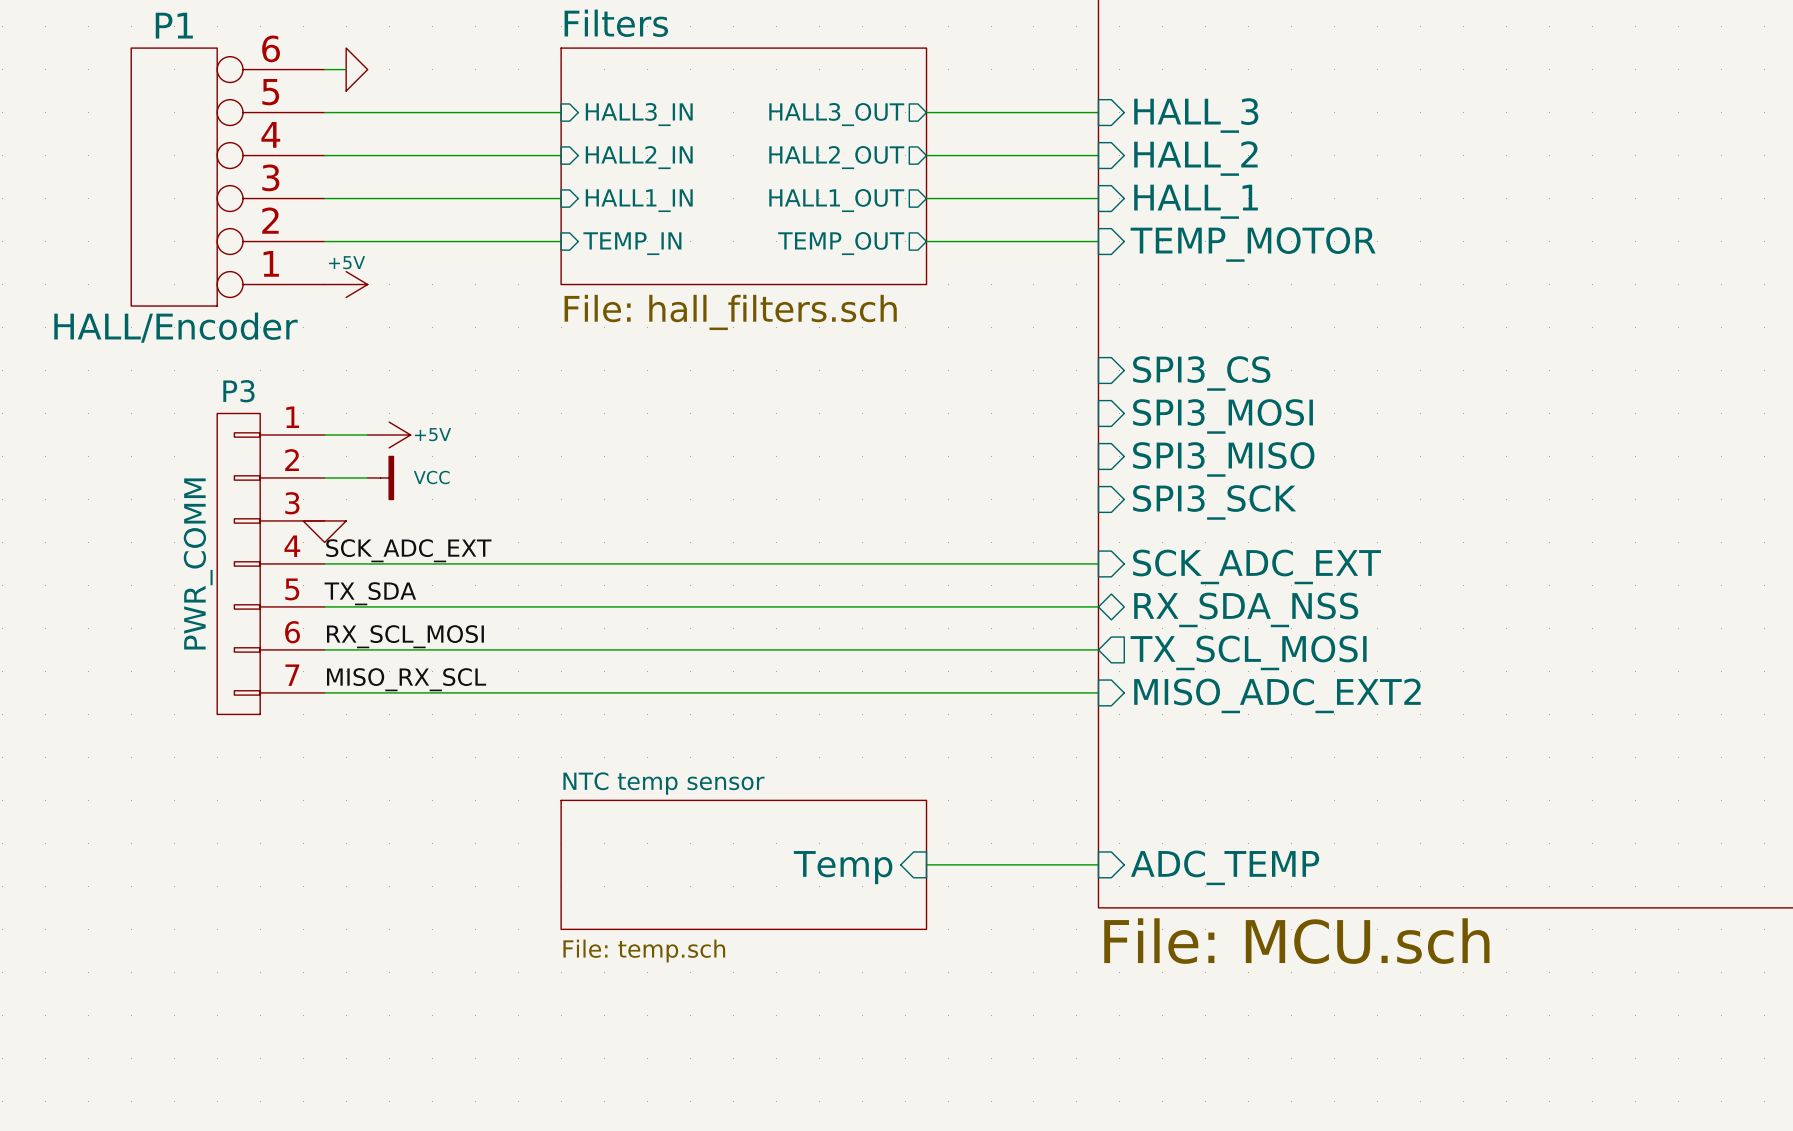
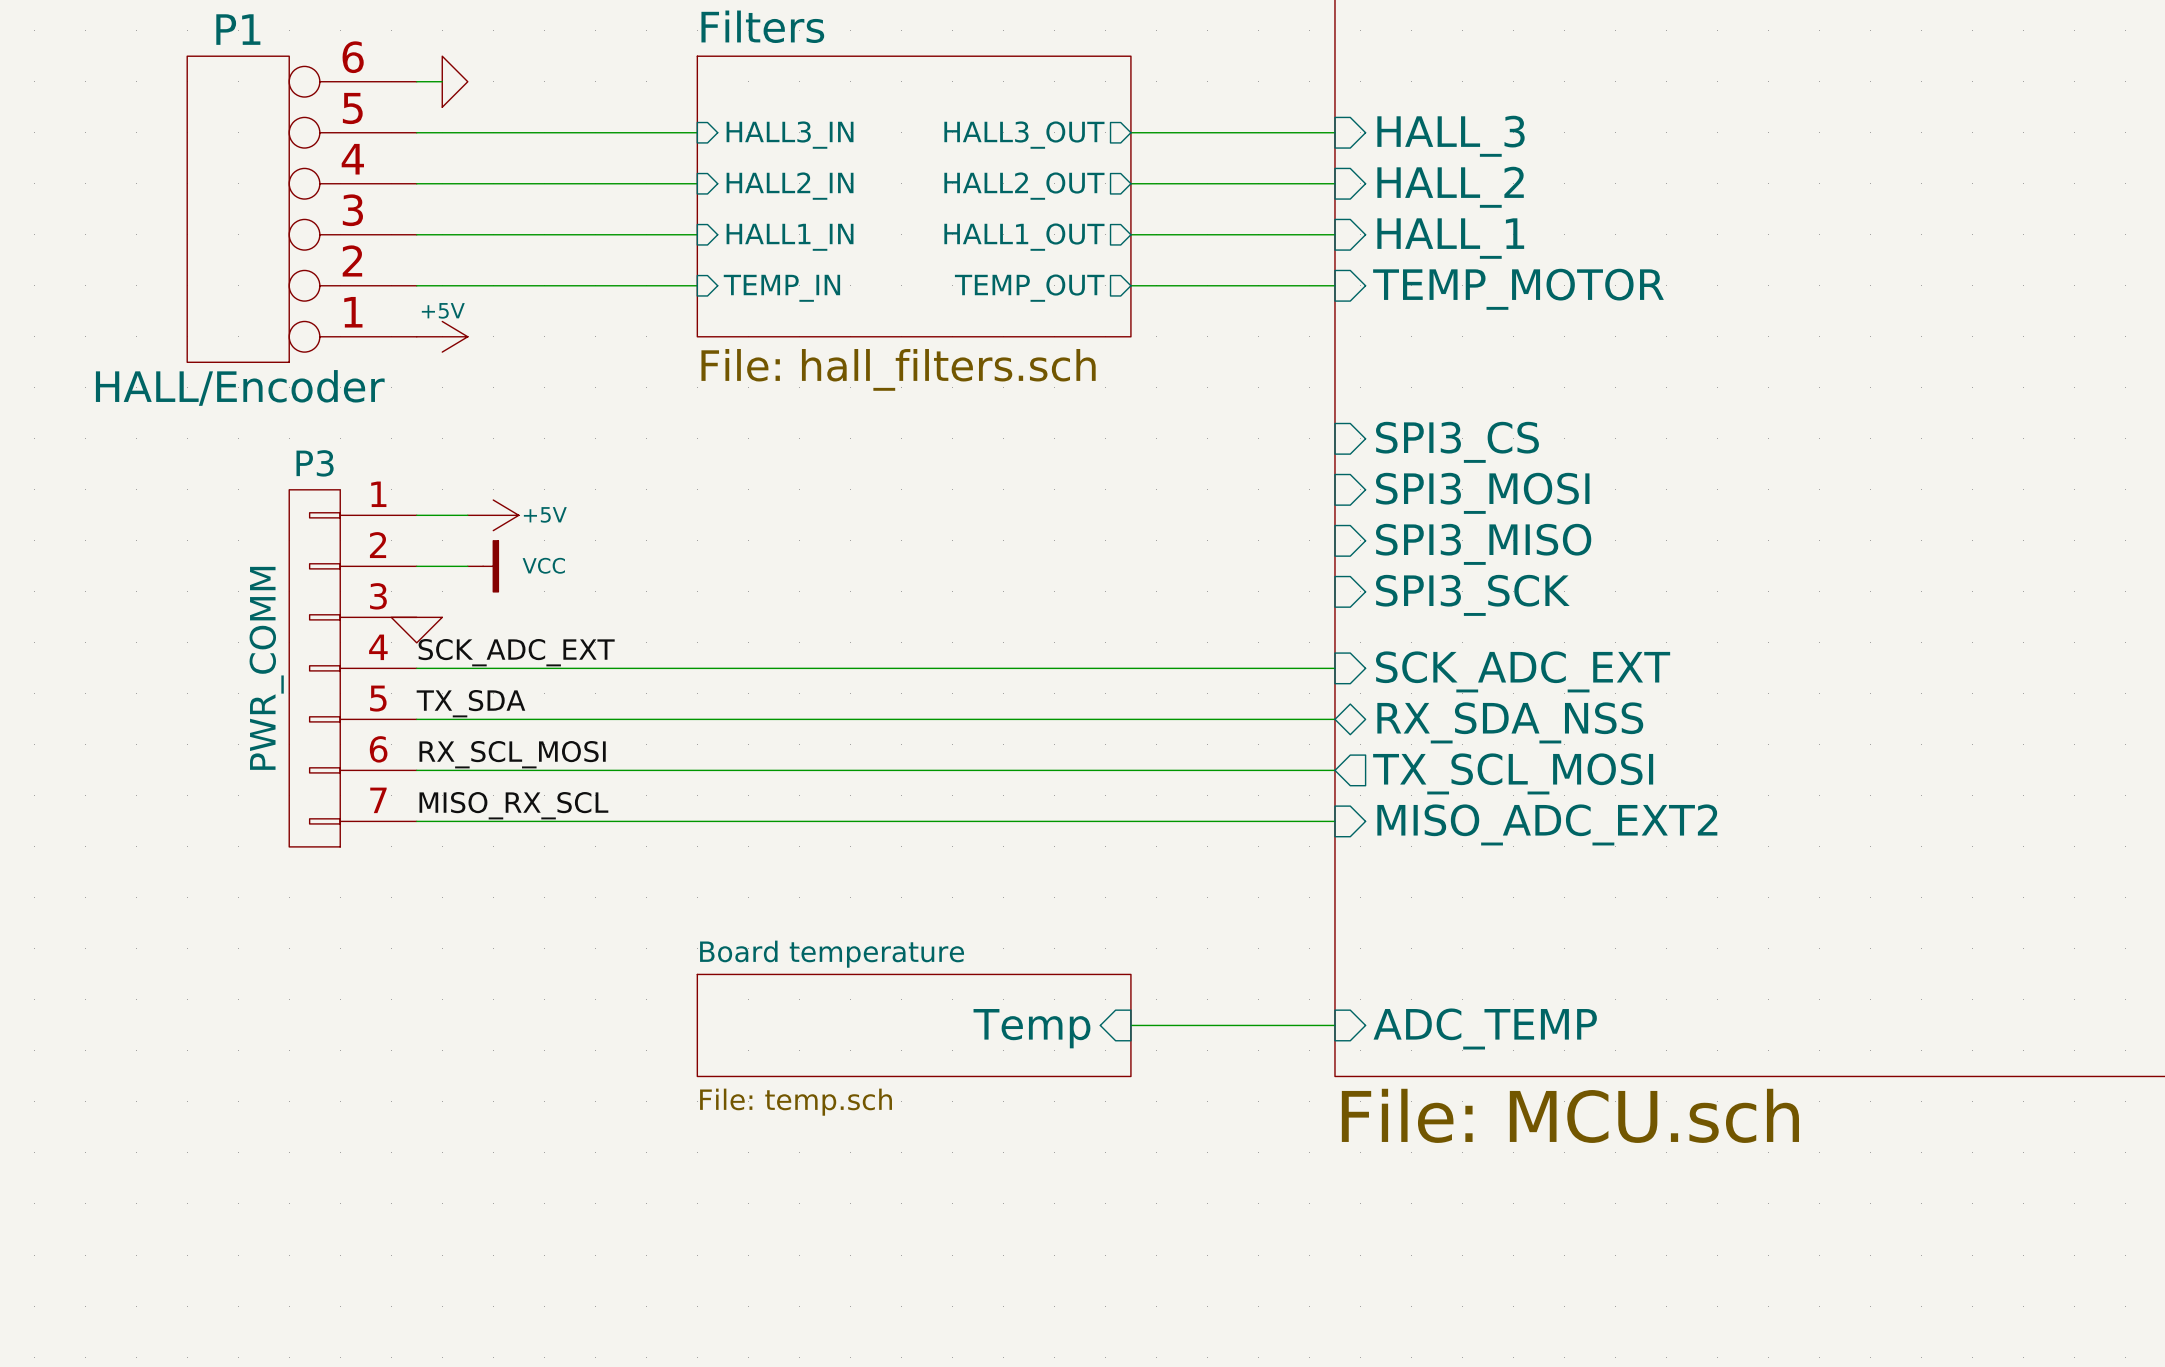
sheet NTC temp sensor: File: temp.sch (743, 864) -> none
sheet Board temperature: none -> File: temp.sch (914, 1025)

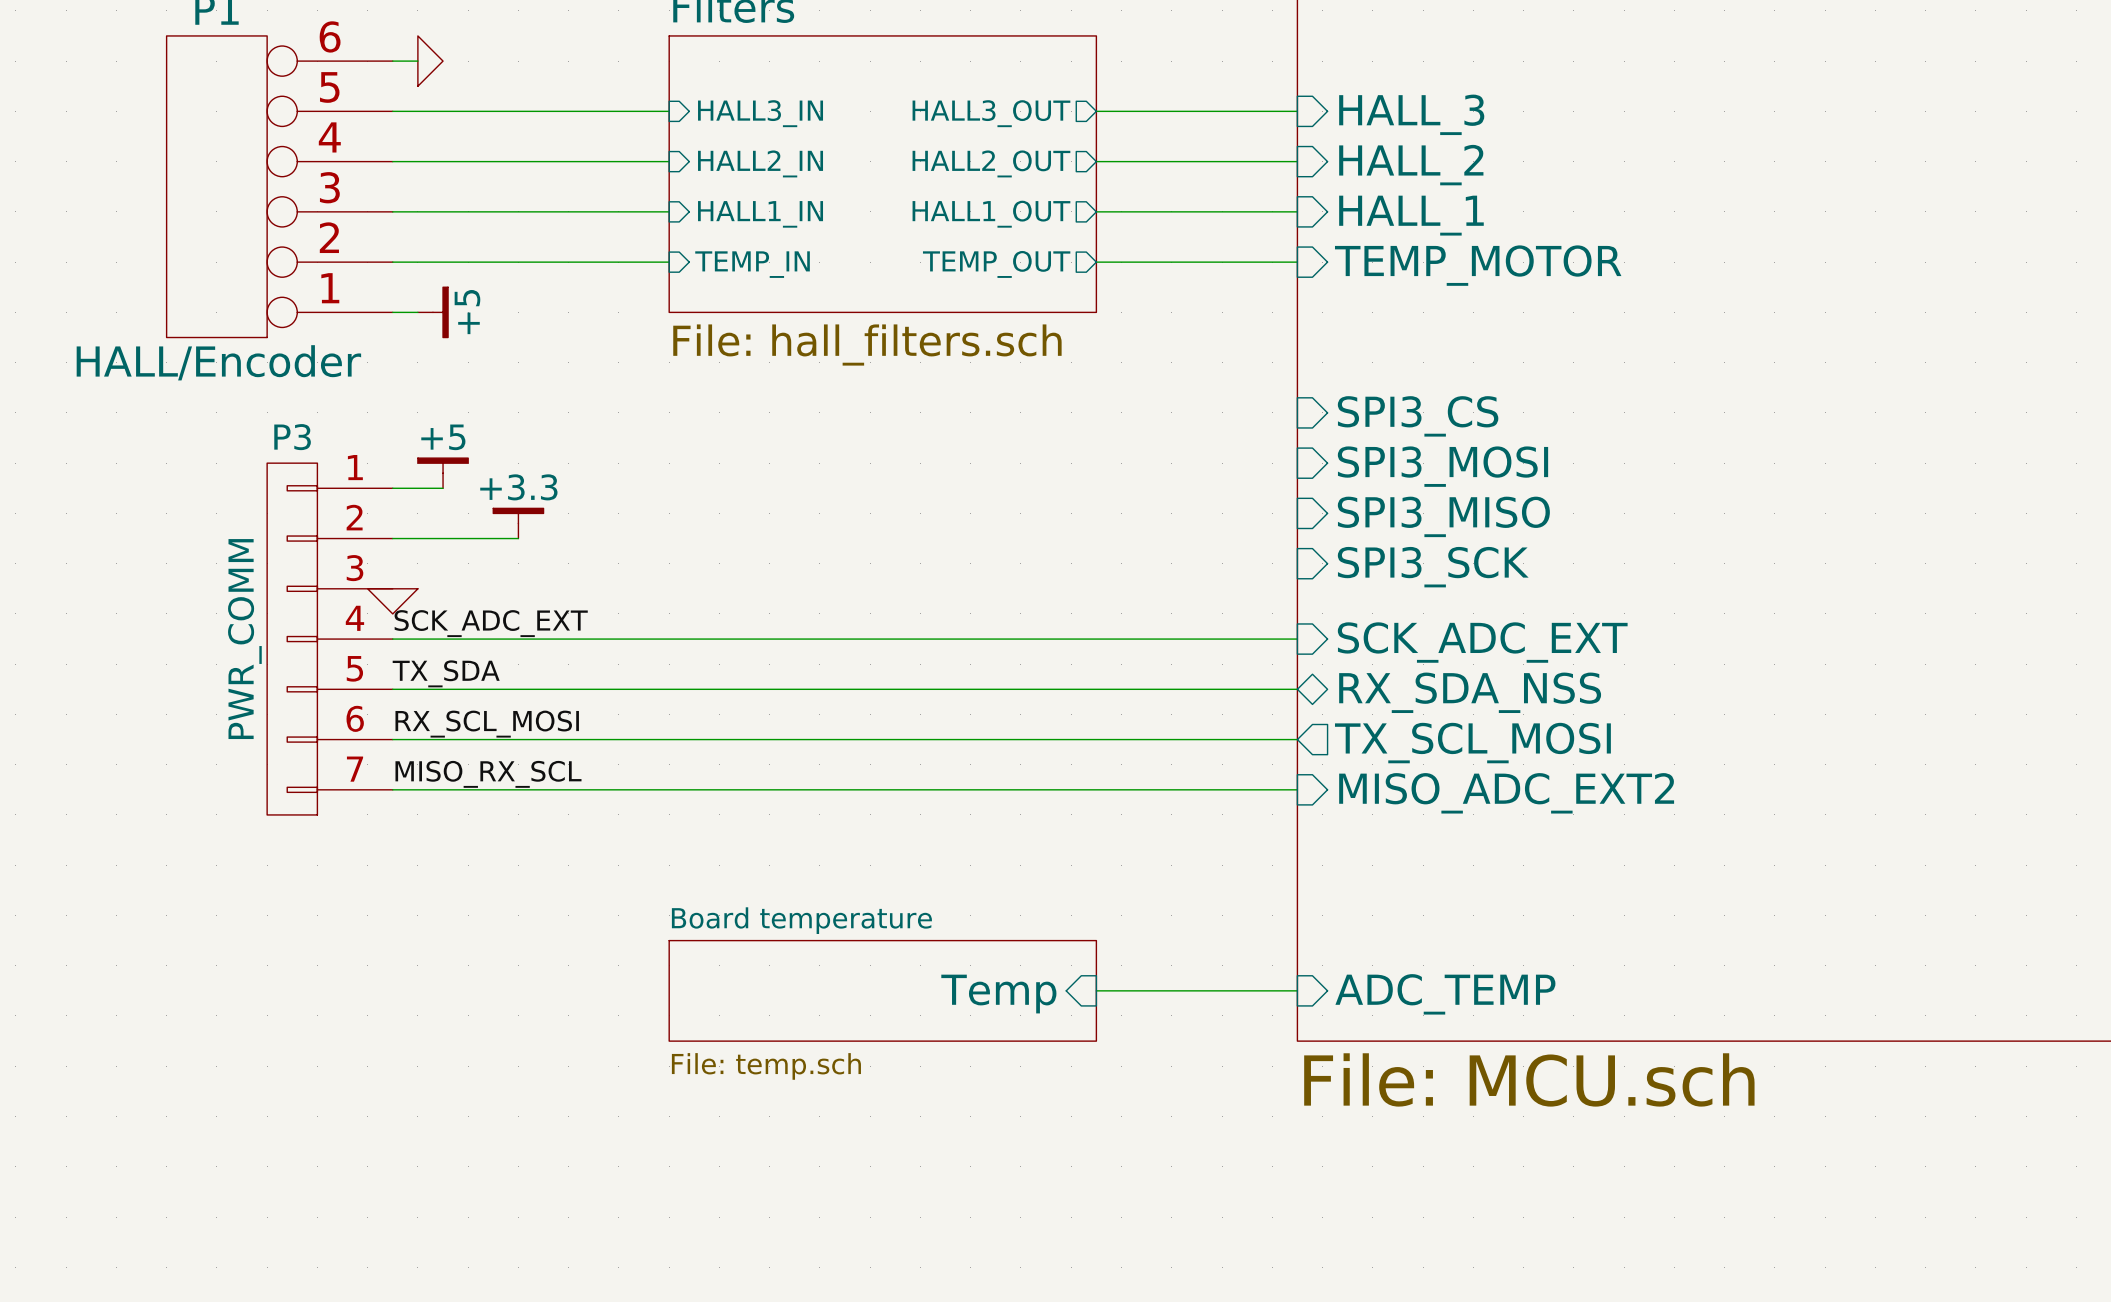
power symbol: +5V (442, 336) -> +5 (432, 312)
power symbol: none -> +5 (443, 473)
power symbol: +5V (493, 515) -> none
power symbol: none -> +3.3 (518, 523)
wire: none -> (443, 538) (518, 538)
power symbol: VCC (483, 566) -> none

